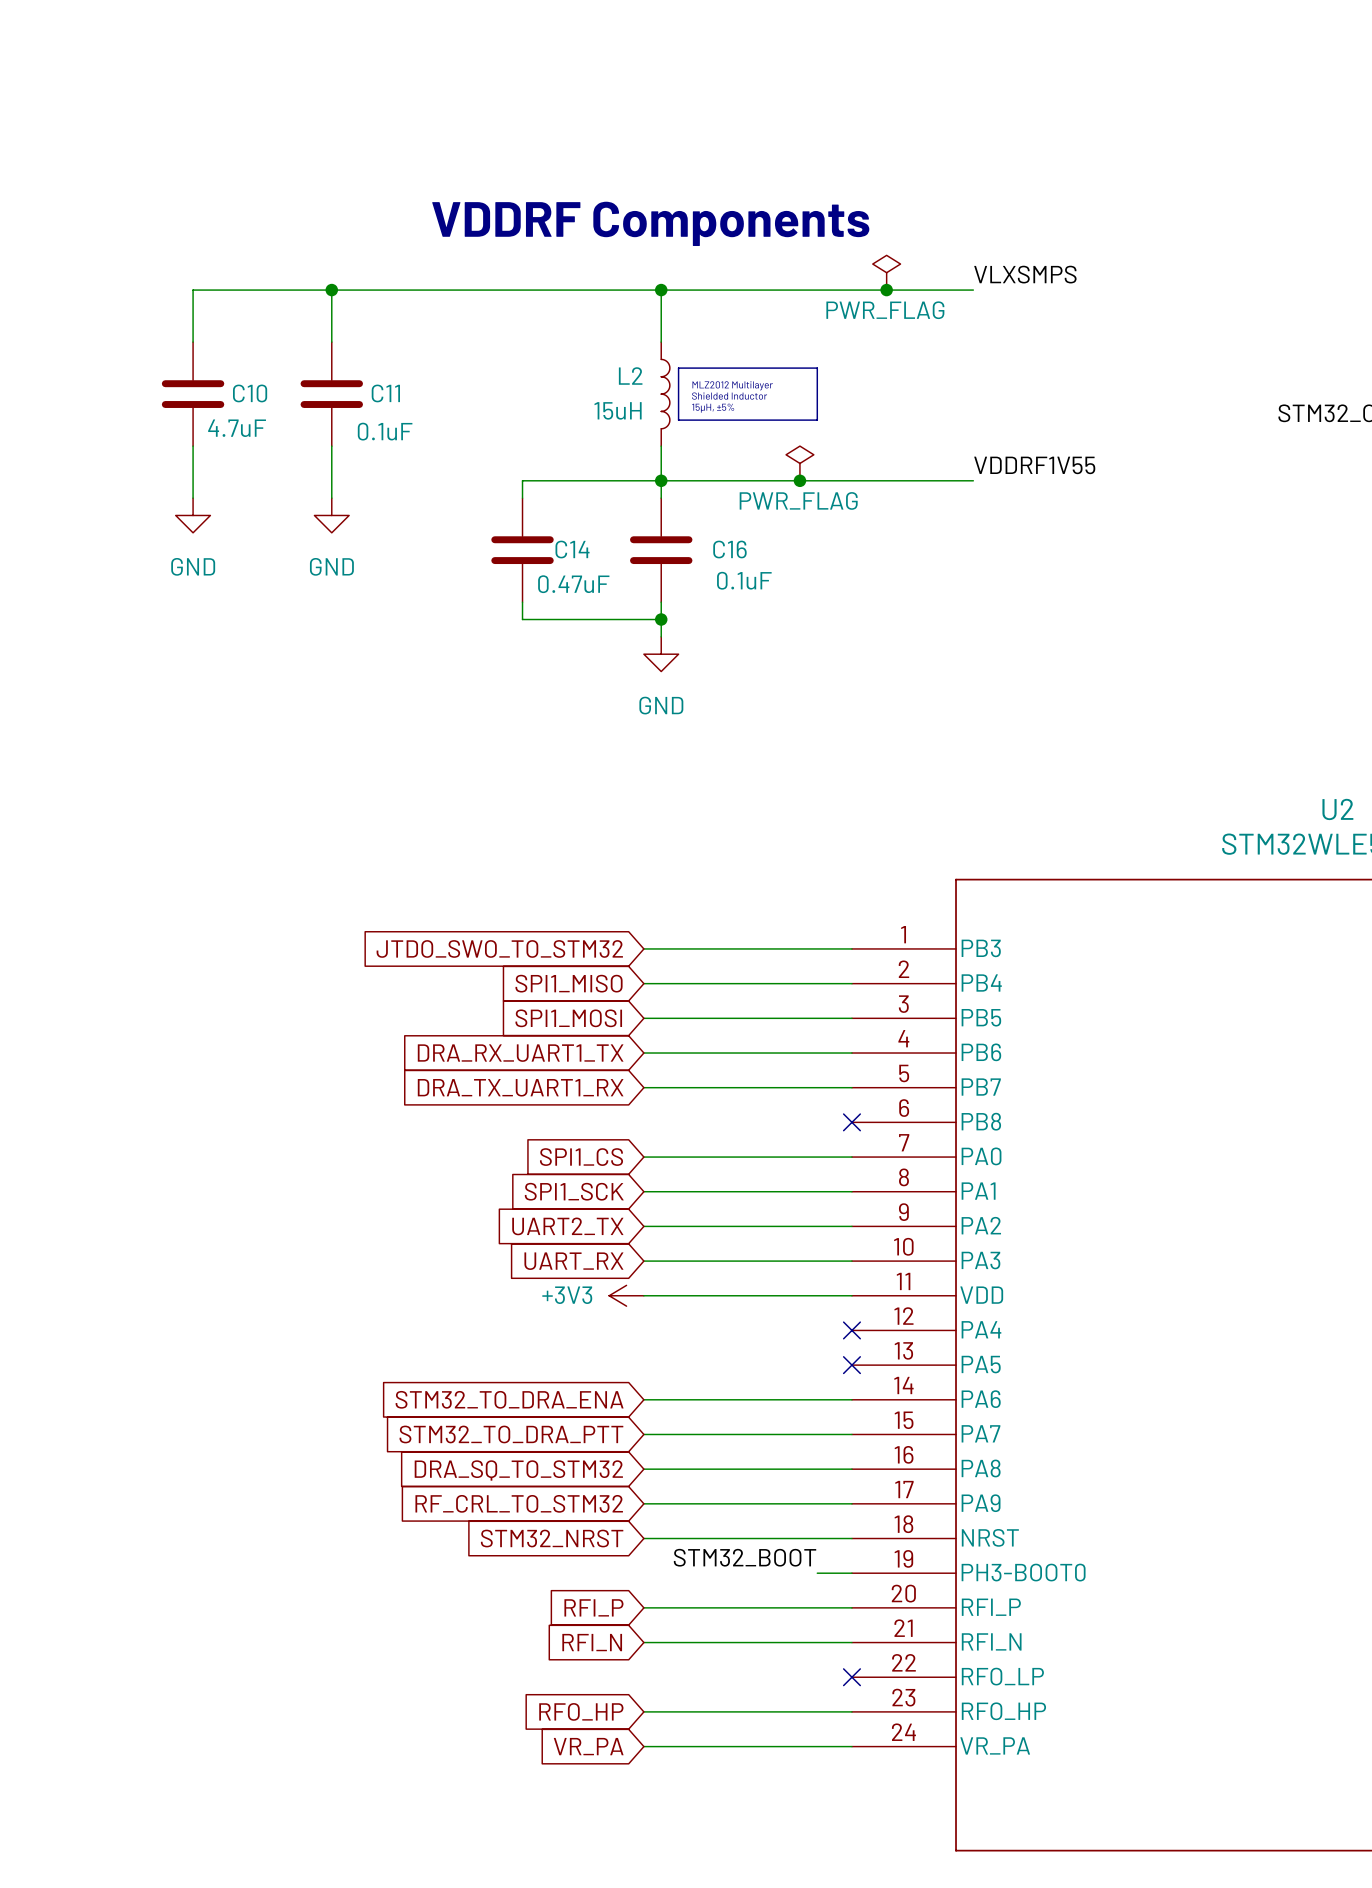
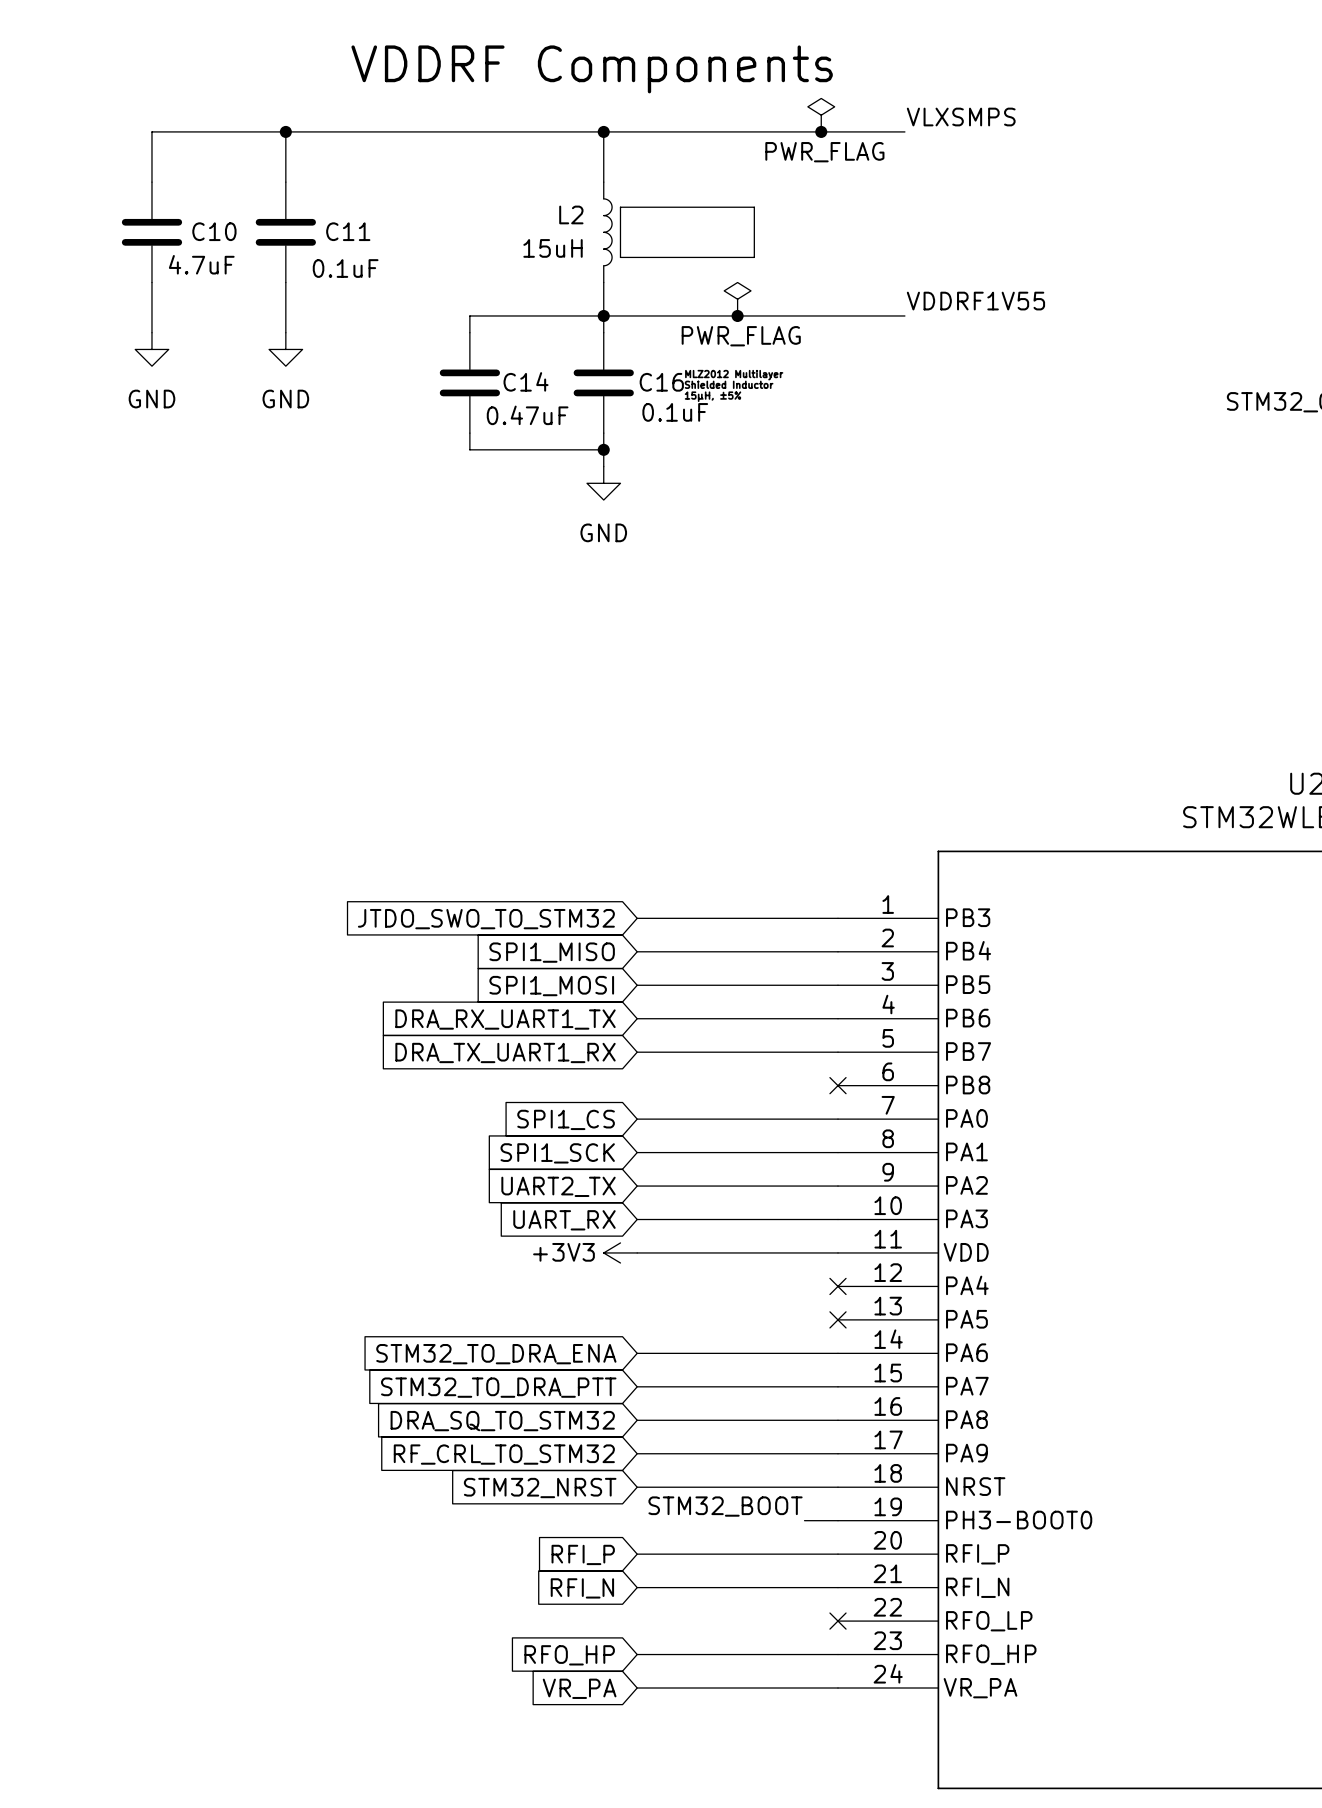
power symbol: none -> PWR_FLAG (821, 115)
junction: none -> (285, 131)
junction: none -> (603, 131)
junction: none -> (821, 131)
text position: VDDRF Components (650, 223) -> VDDRF Components (592, 69)
power symbol: PWR_FLAG (886, 272) -> none
label position: VLXSMPS (1025, 274) -> VLXSMPS (961, 117)
wire: (331, 290) (331, 342) -> (285, 131) (285, 182)
junction: (331, 290) -> none
wire: (661, 290) (661, 342) -> (603, 131) (603, 182)
junction: (661, 290) -> none
junction: (886, 290) -> none
wire: (973, 290) (193, 290) (193, 342) -> (904, 131) (151, 131) (151, 182)
power symbol: none -> PWR_FLAG (737, 299)
junction: none -> (603, 315)
junction: none -> (737, 315)
power symbol: none -> GND (151, 349)
power symbol: none -> GND (285, 349)
line: (678, 368) (817, 368) (817, 420) (678, 420) (678, 368) -> (620, 207) (754, 207) (754, 257) (620, 257) (620, 207)
C10 position: (193, 394) -> (151, 232)
C11 position: (331, 394) -> (285, 232)
L2 position: (665, 394) -> (607, 232)
wire: (193, 446) (193, 498) -> (151, 282) (151, 332)
wire: (331, 446) (331, 498) -> (285, 282) (285, 332)
wire: (661, 446) (661, 498) -> (603, 282) (603, 332)
power symbol: PWR_FLAG (799, 463) -> none
label position: VDDRF1V55 (1034, 465) -> VDDRF1V55 (975, 301)
junction position: (661, 480) -> (603, 449)
junction: (799, 480) -> none
wire: (973, 480) (522, 480) (522, 498) -> (904, 315) (469, 315) (469, 332)
power symbol: none -> GND (603, 483)
power symbol: GND (193, 515) -> none
power symbol: GND (331, 515) -> none
C14 position: (522, 550) -> (469, 382)
C16 position: (661, 550) -> (603, 382)
wire: (522, 602) (522, 619) (661, 619) -> (469, 433) (469, 449) (603, 449)
wire: (661, 602) (661, 636) -> (603, 433) (603, 466)
junction: (661, 619) -> none
power symbol: GND (661, 654) -> none

